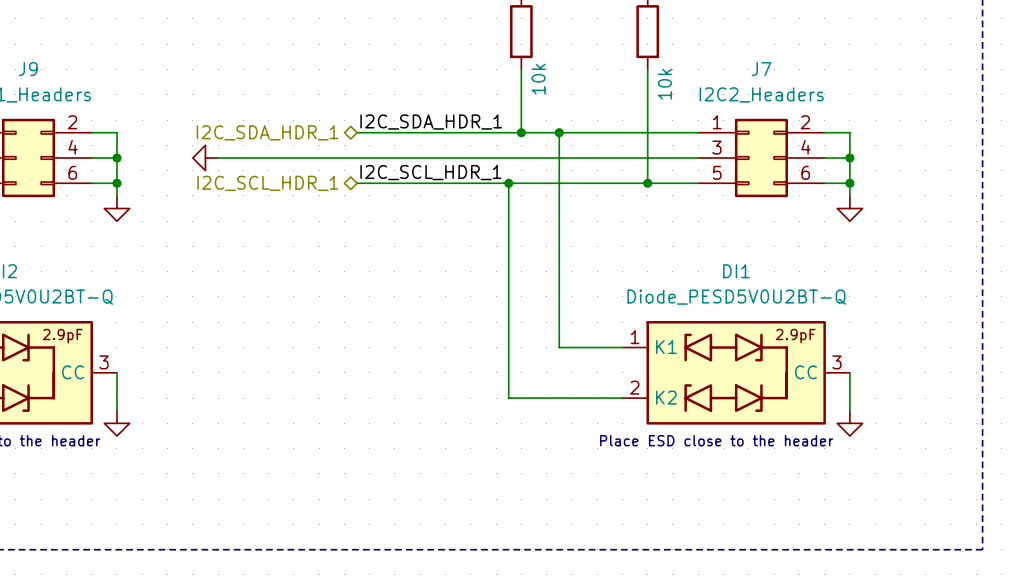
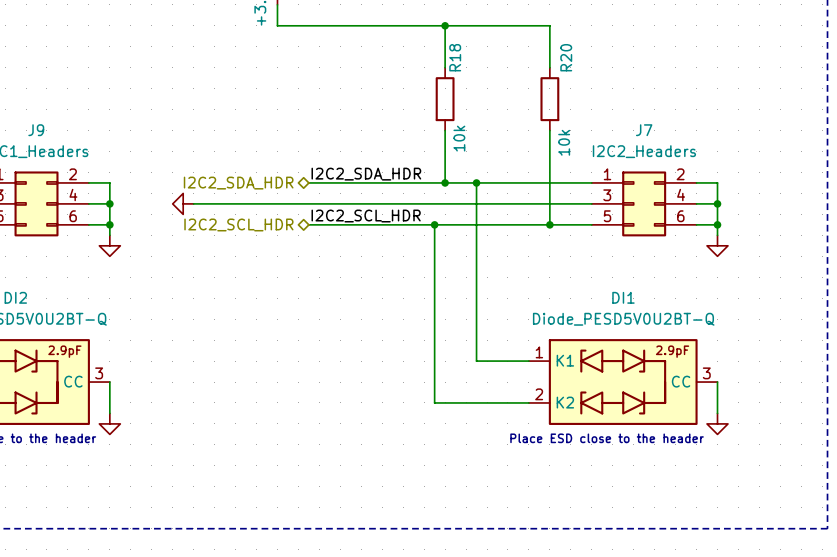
label: I2C_SDA_HDR_1 (431, 122) -> I2C2_SDA_HDR (366, 174)
hierarchical label: I2C_SDA_HDR_1 (267, 132) -> I2C2_SDA_HDR (238, 183)
label: I2C_SCL_HDR_1 (430, 172) -> I2C2_SCL_HDR (366, 216)
hierarchical label: I2C_SCL_HDR_1 (267, 183) -> I2C2_SCL_HDR (238, 224)

